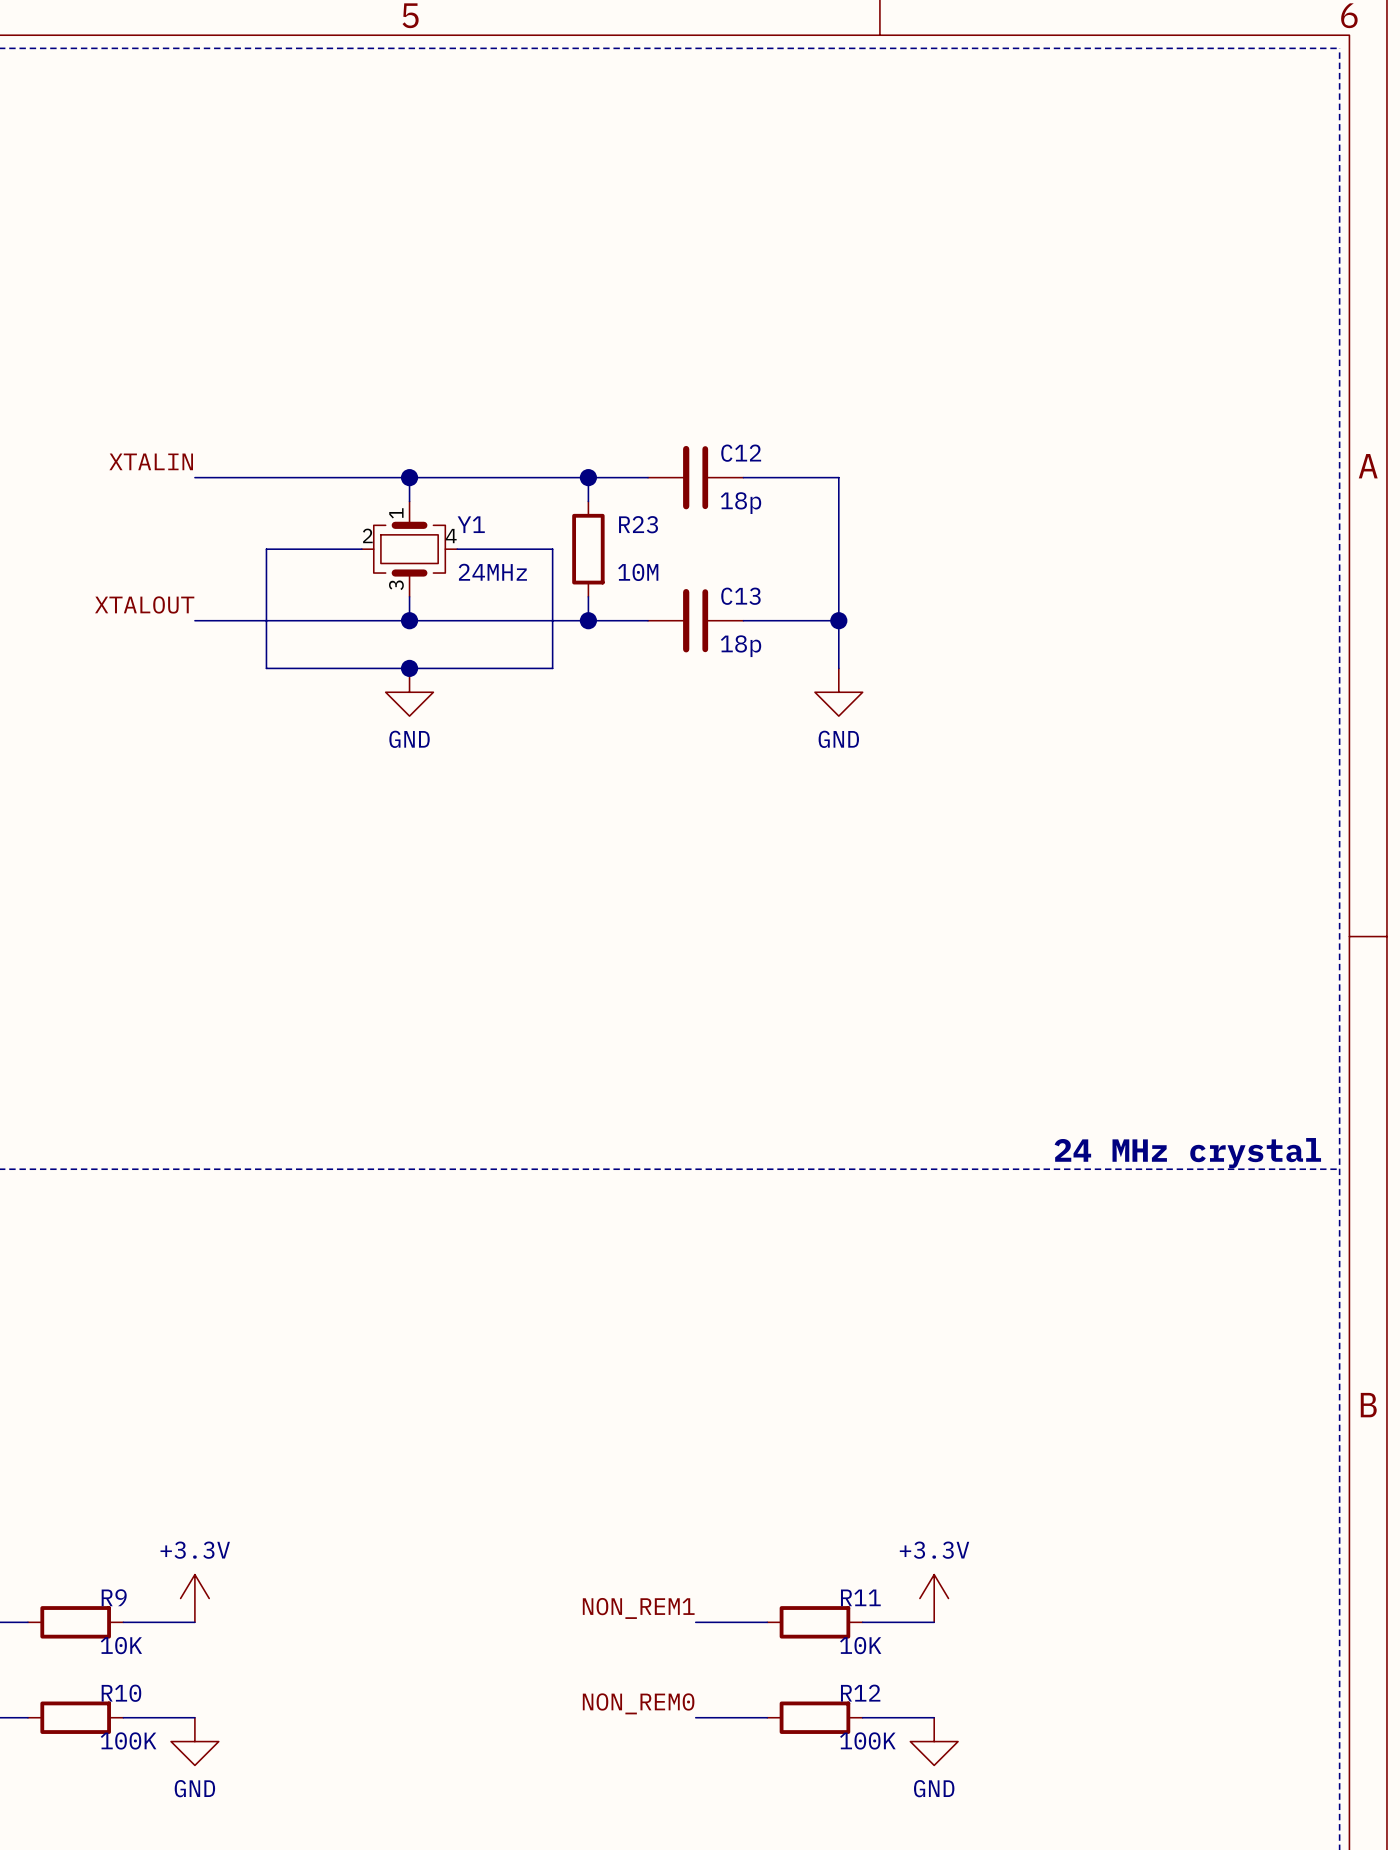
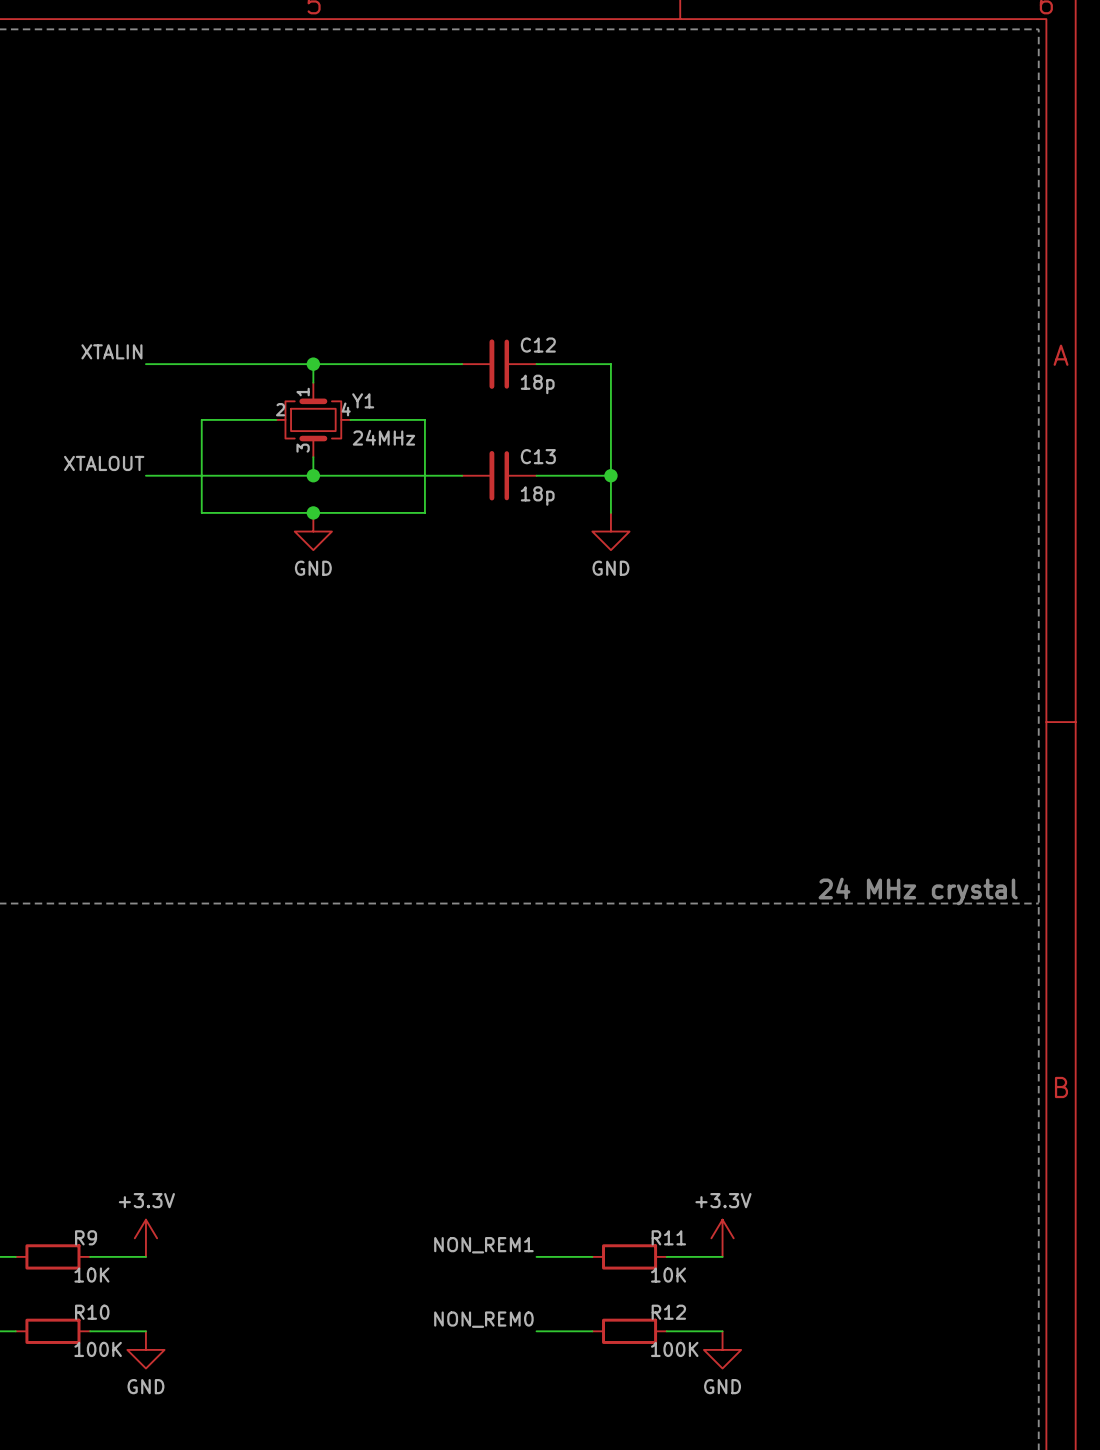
wire: (588, 477) (588, 501) -> none
junction: (588, 477) -> none
C12 position: (695, 477) -> (499, 364)
wire: (791, 477) (838, 477) (838, 668) -> (610, 364) (610, 512)
R23: 10M (588, 549) -> none
wire: (588, 596) (588, 620) -> none
junction: (588, 620) -> none
C13 position: (695, 620) -> (499, 475)
wire: (791, 620) (838, 620) -> none
junction position: (838, 620) -> (610, 475)
power symbol position: GND (838, 692) -> GND (610, 531)

